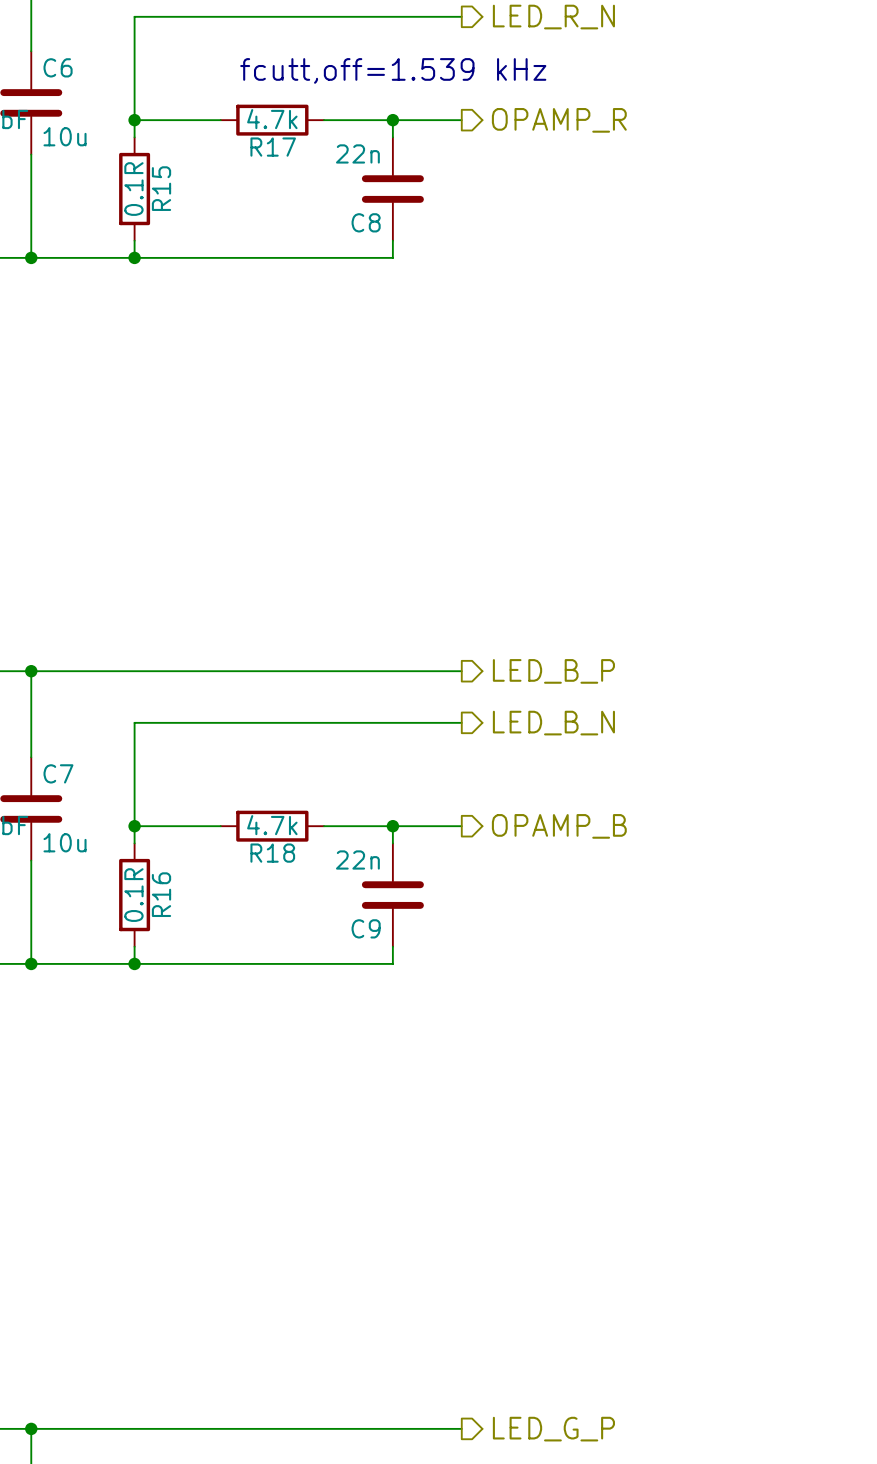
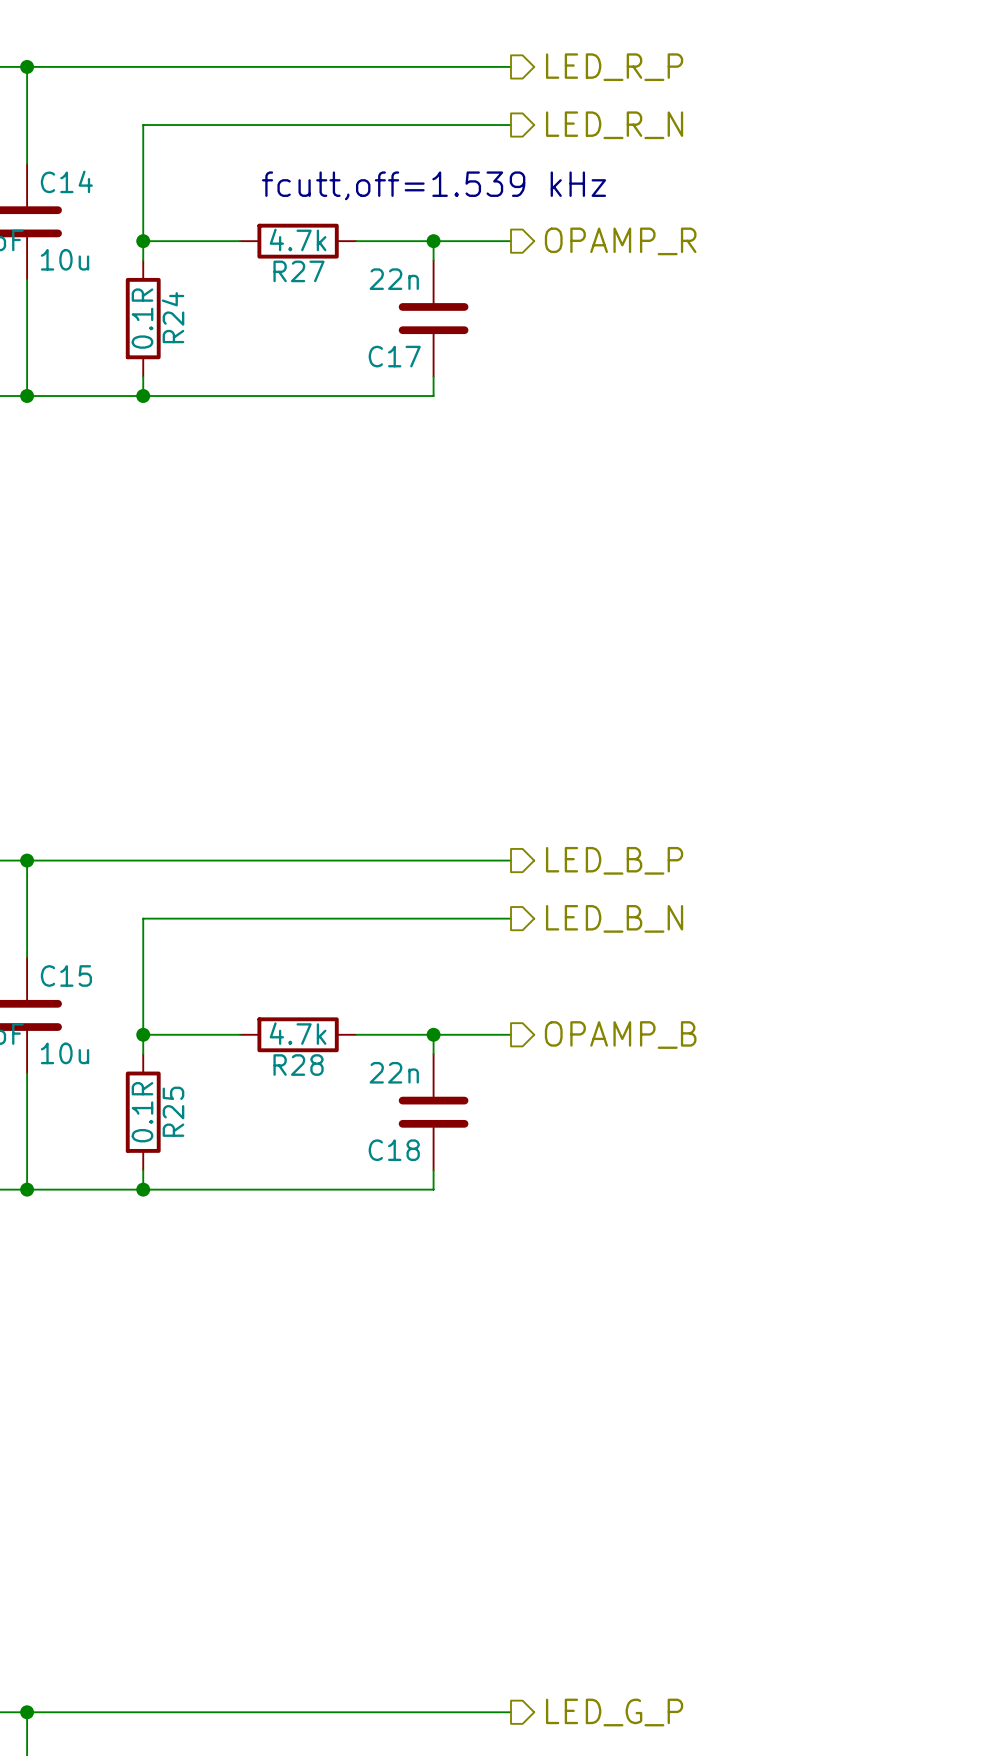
C6 name: C6 (58, 67) -> C14 (66, 181)
R17 name: R17 (273, 147) -> R27 (299, 271)
R15 name: R15 (161, 188) -> R24 (173, 317)
C8 name: C8 (366, 222) -> C17 (394, 356)
C7 name: C7 (58, 773) -> C15 (66, 975)
R18 name: R18 (272, 853) -> R28 (298, 1065)
R16 name: R16 (161, 894) -> R25 (173, 1111)
C9 name: C9 (366, 928) -> C18 (394, 1150)

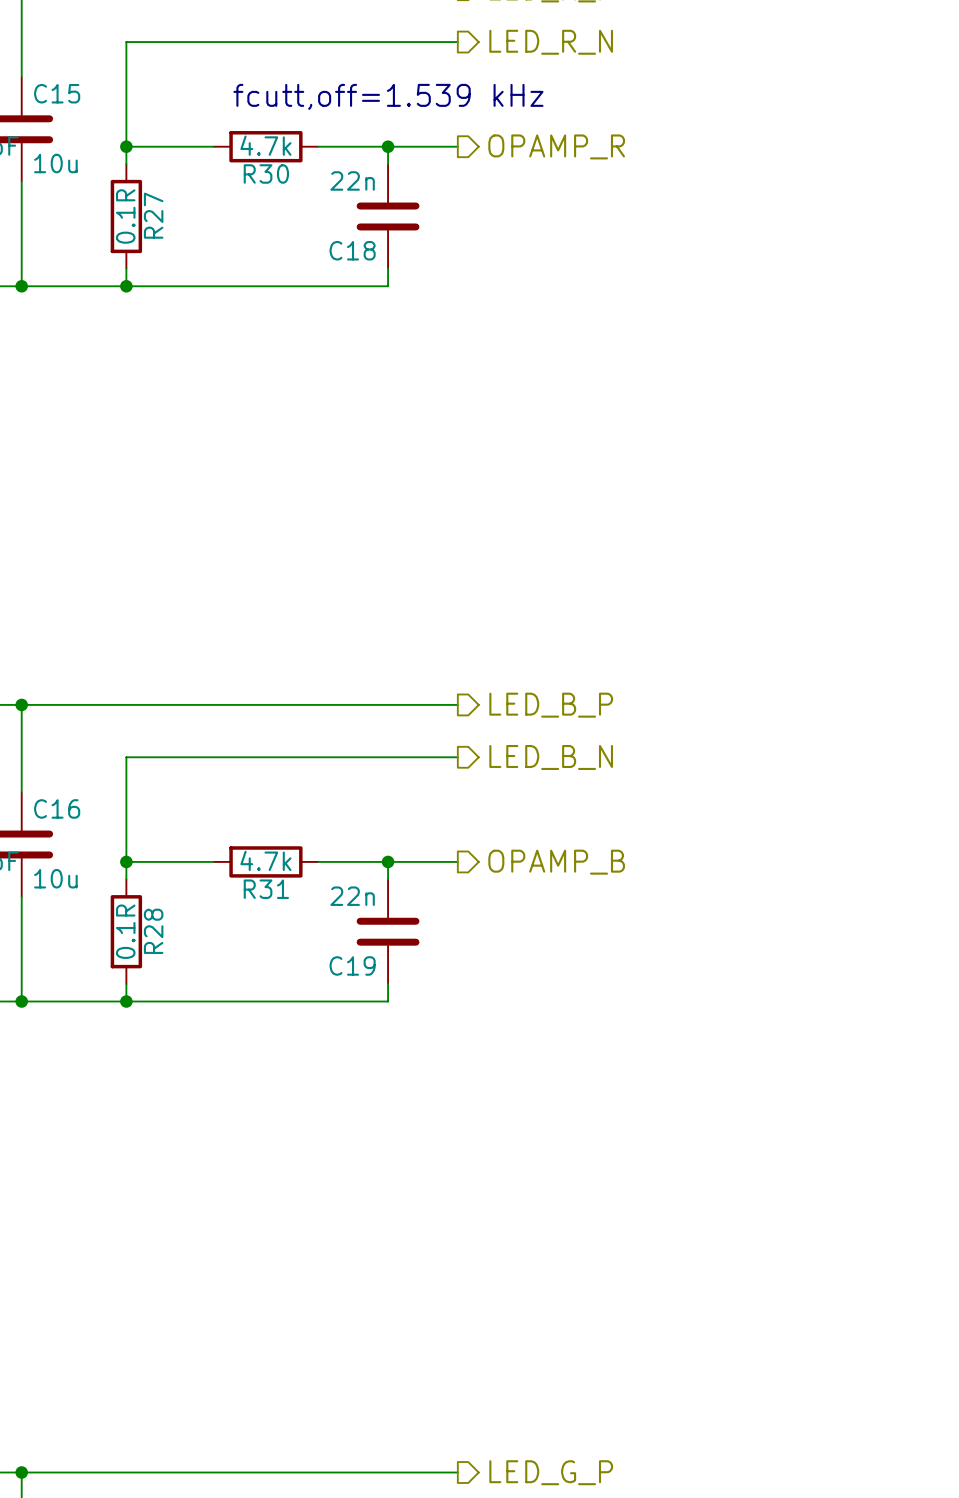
C14 name: C14 (66, 181) -> C15 (57, 93)
R27 name: R27 (299, 271) -> R30 (266, 173)
R24 name: R24 (173, 317) -> R27 (153, 215)
C17 name: C17 (394, 356) -> C18 (352, 250)
C15 name: C15 (66, 975) -> C16 (57, 808)
R28 name: R28 (298, 1065) -> R31 (266, 889)
R25 name: R25 (173, 1111) -> R28 (153, 931)
C18 name: C18 (394, 1150) -> C19 (352, 965)

